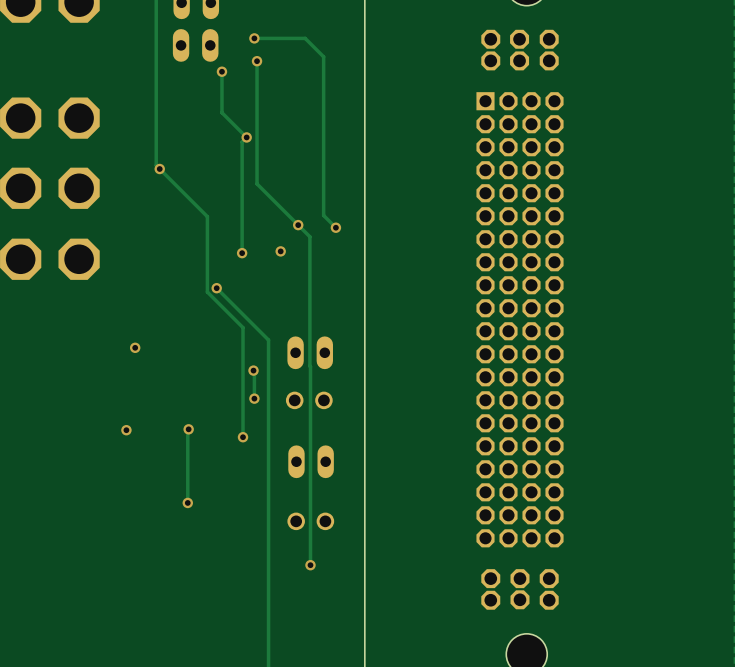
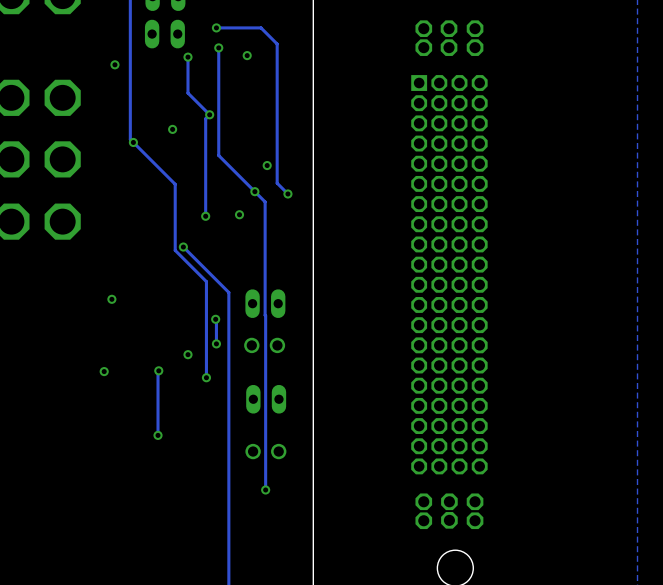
via: none -> (247, 55)
via: none -> (114, 64)
via: none -> (172, 129)
via: none -> (267, 165)
via: none -> (187, 354)

